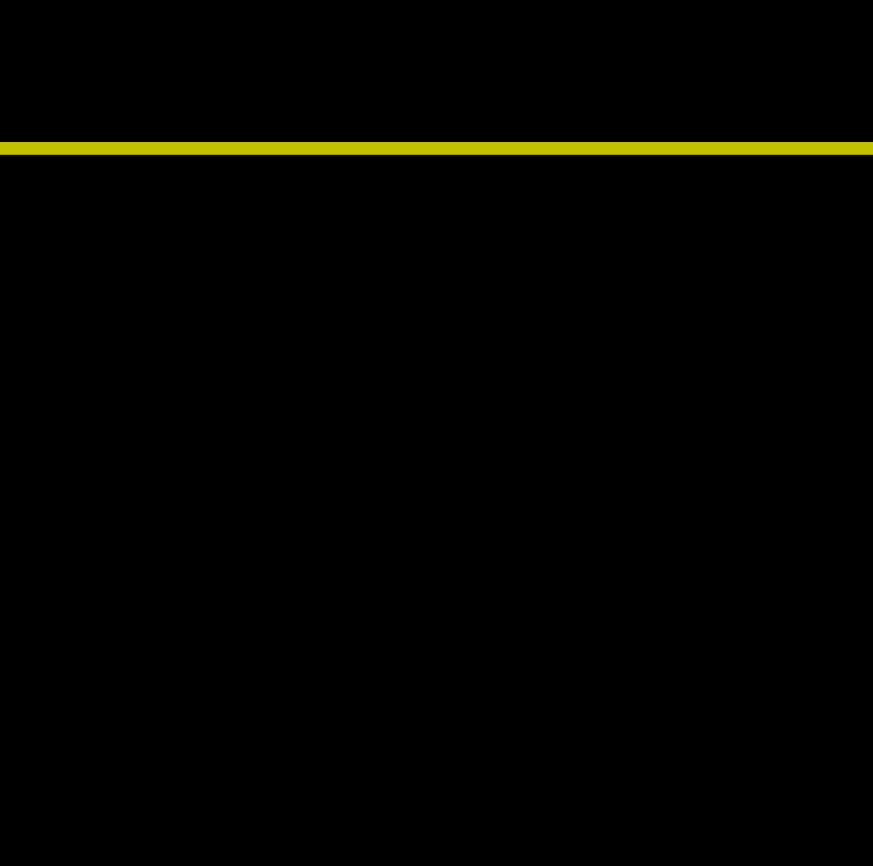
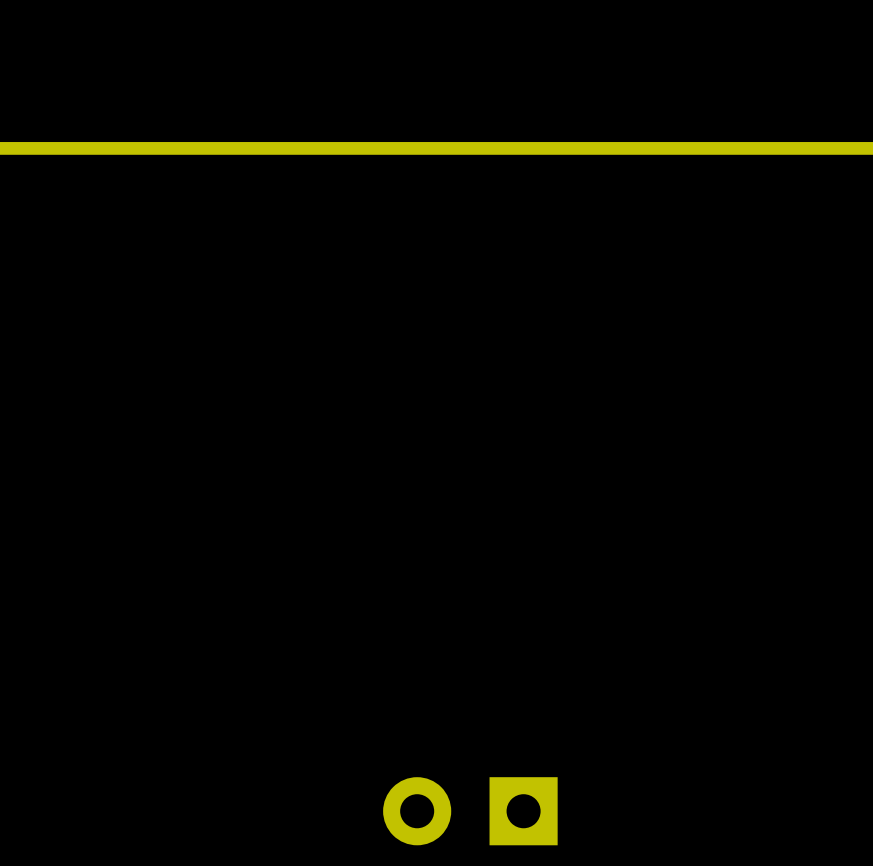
part: none -> (470, 811)

